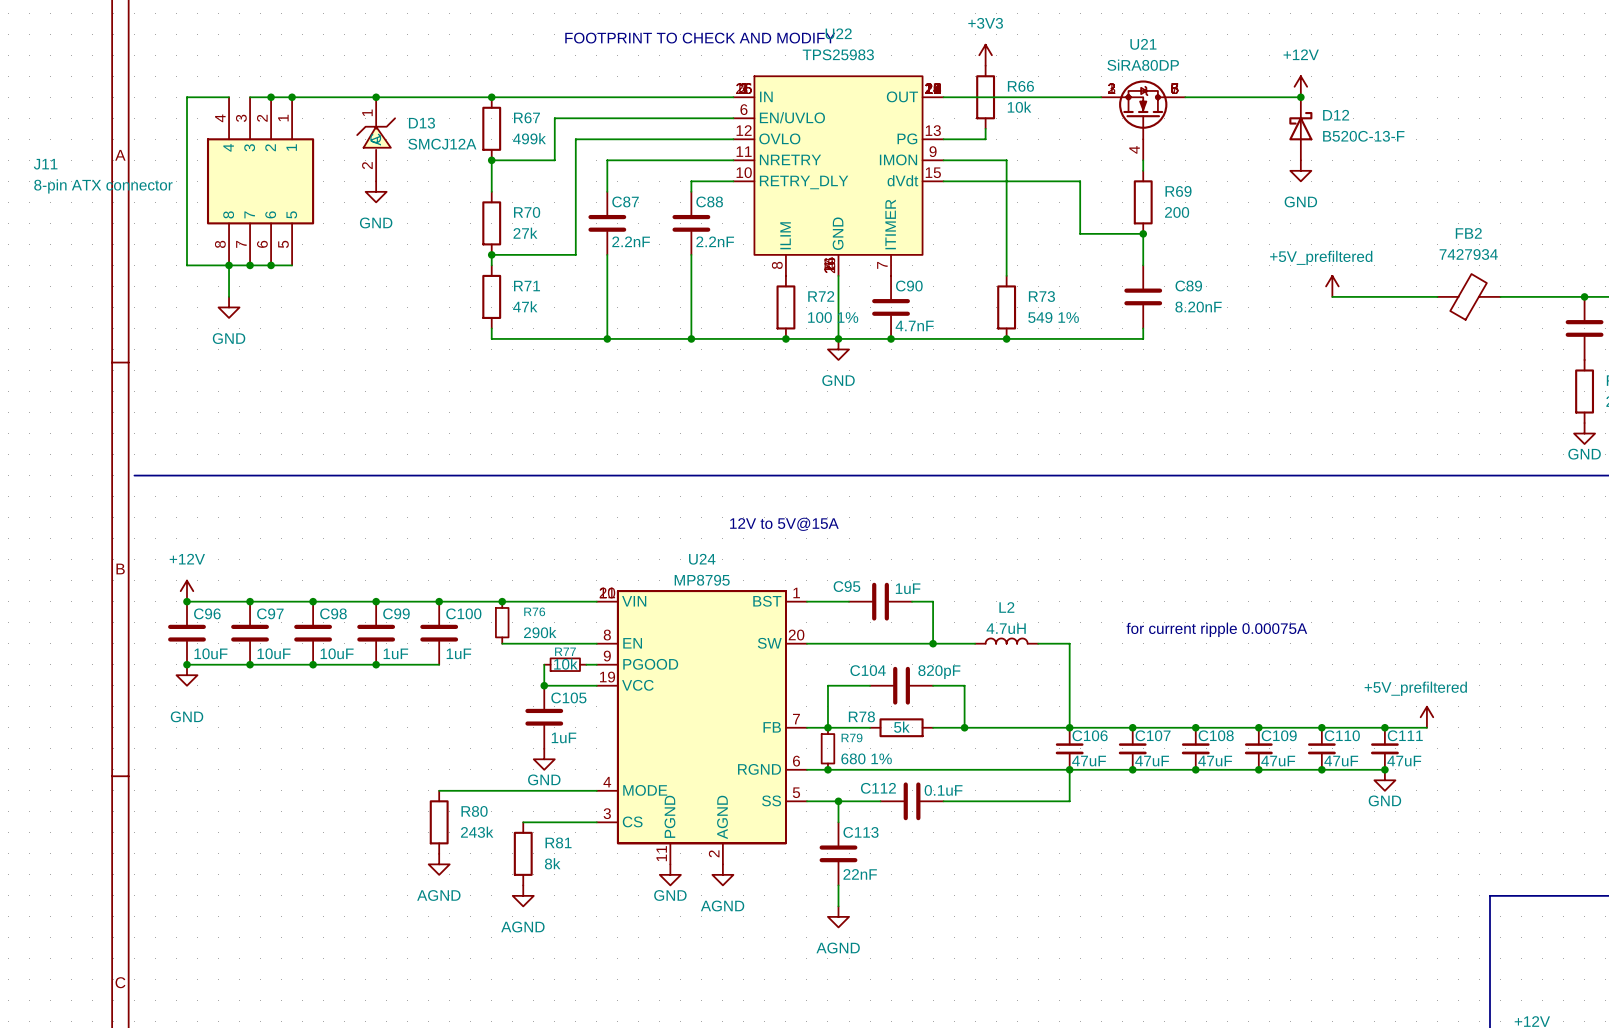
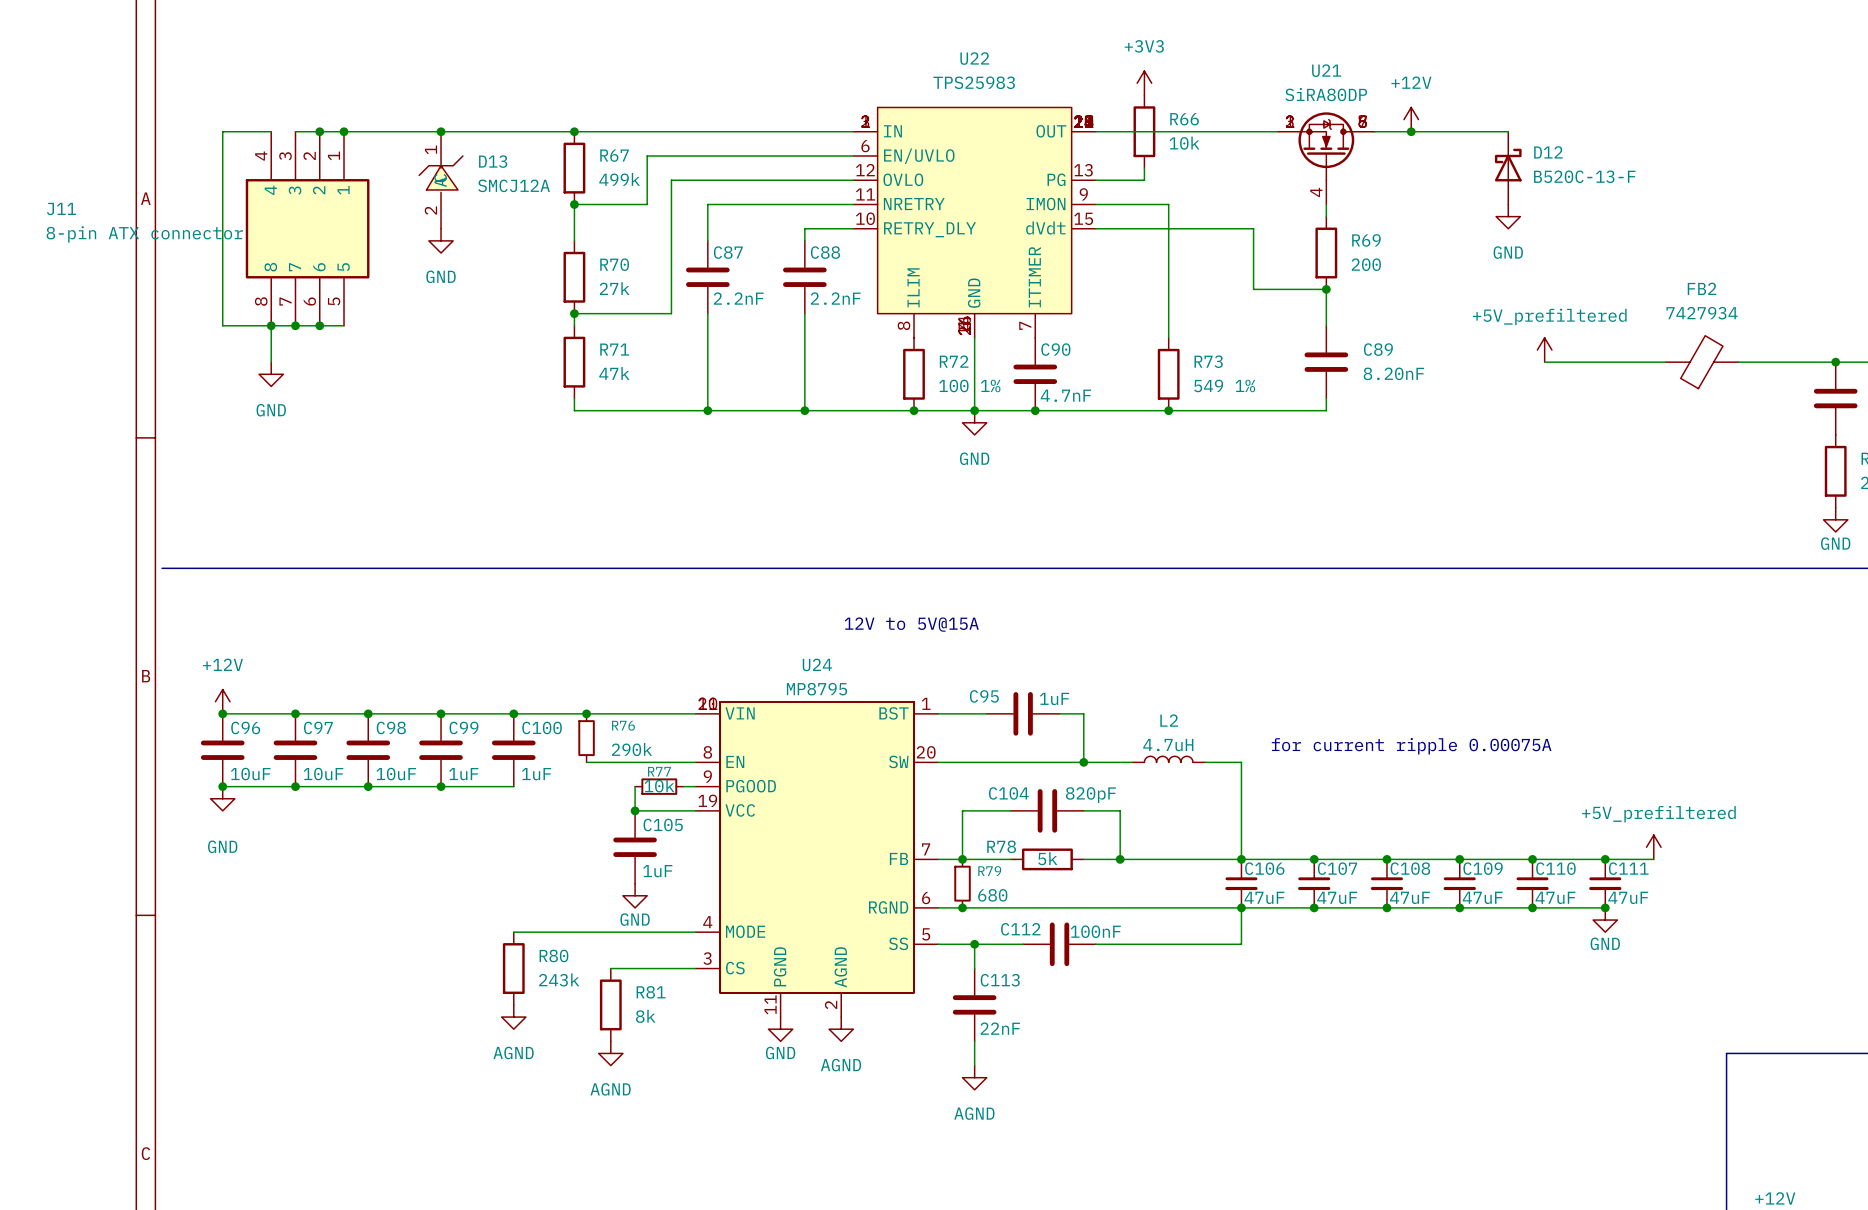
text: FOOTPRINT TO CHECK AND MODIFY (700, 38) -> none
U22 symbol: [733, 76, 944, 276] -> [853, 107, 1096, 338]
power symbol position: +12V (1300, 86) -> +12V (1411, 119)
junction: none -> (1411, 131)
junction: (1300, 97) -> none
R79 value: 680 1% (866, 758) -> 680 (992, 895)
C112 value: 0.1uF (943, 790) -> 100nF (1095, 931)

